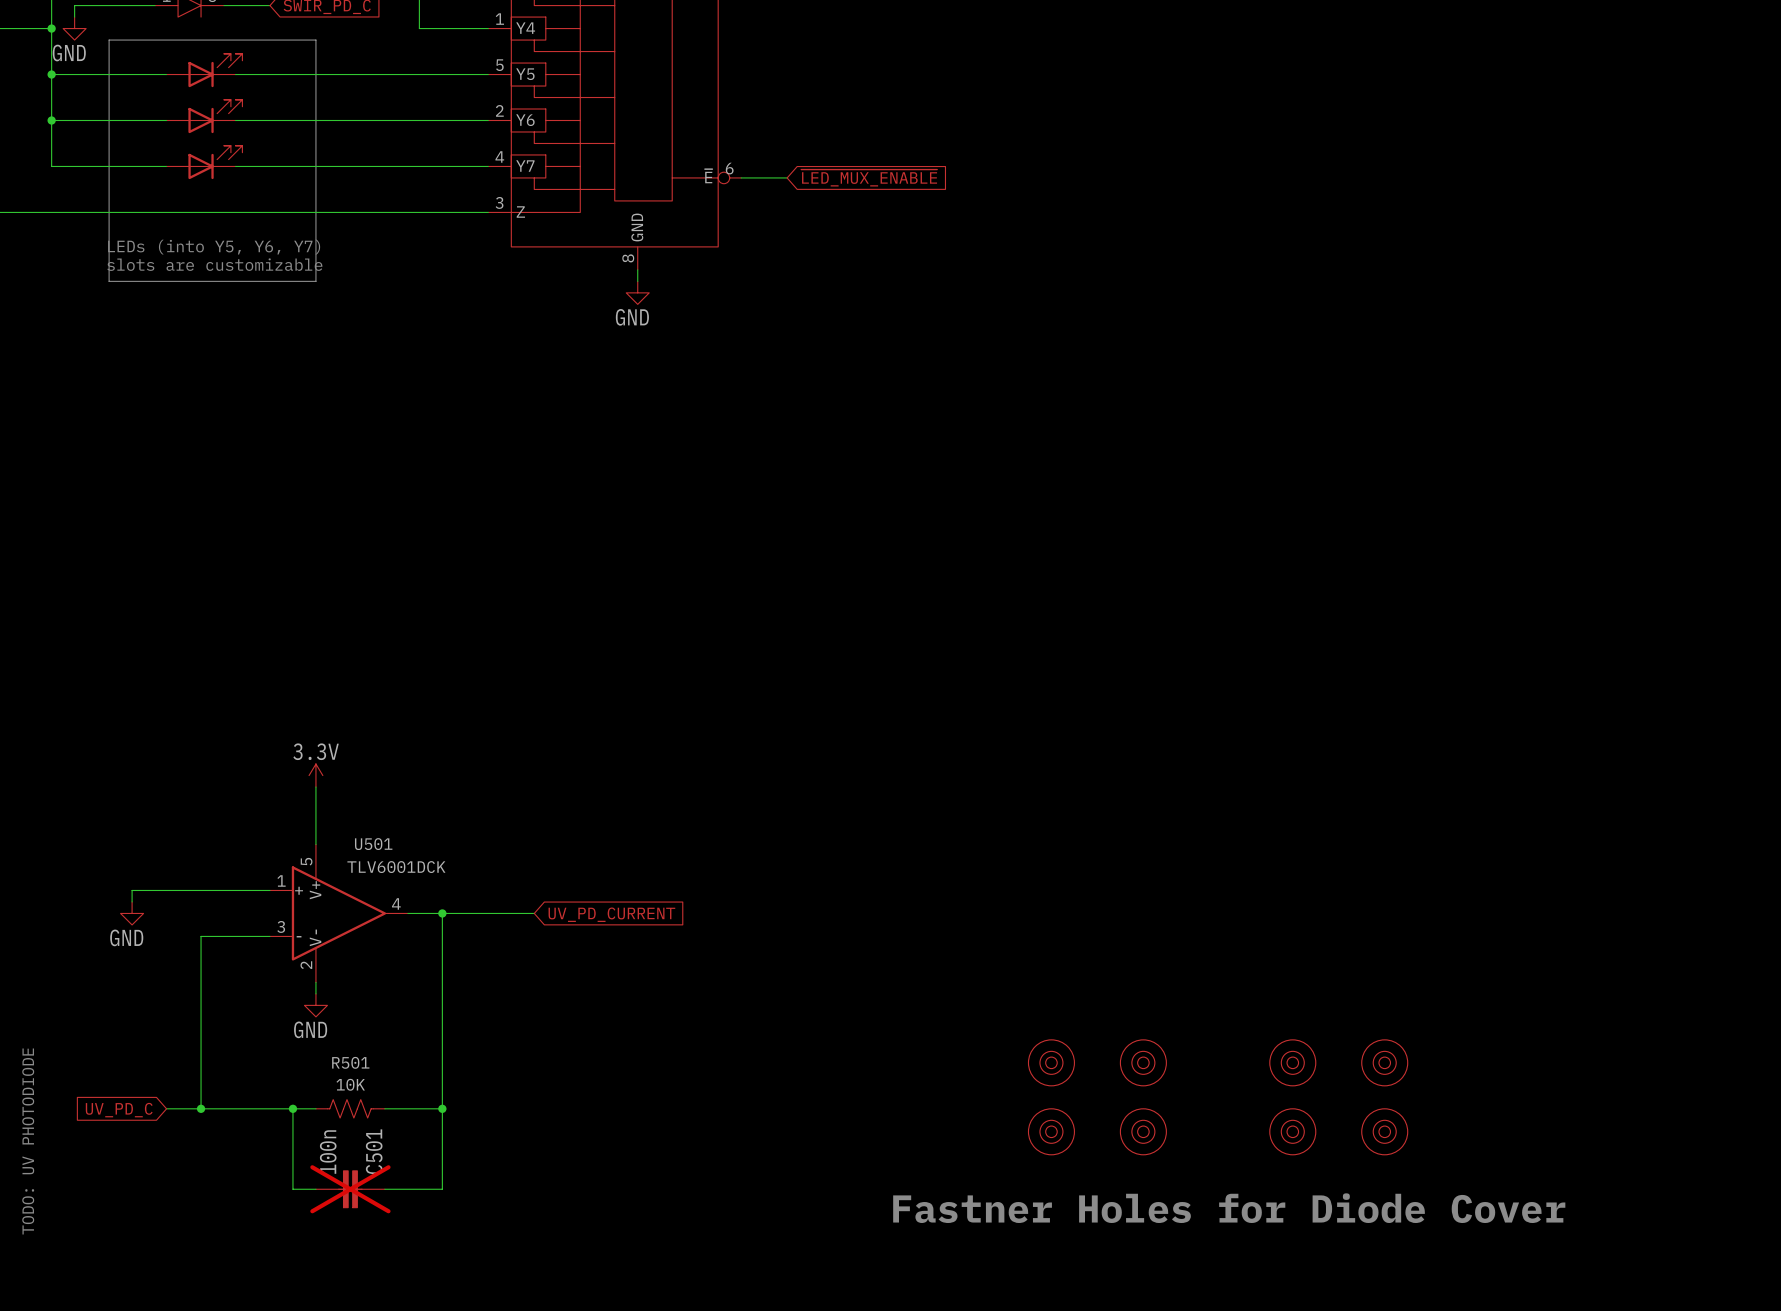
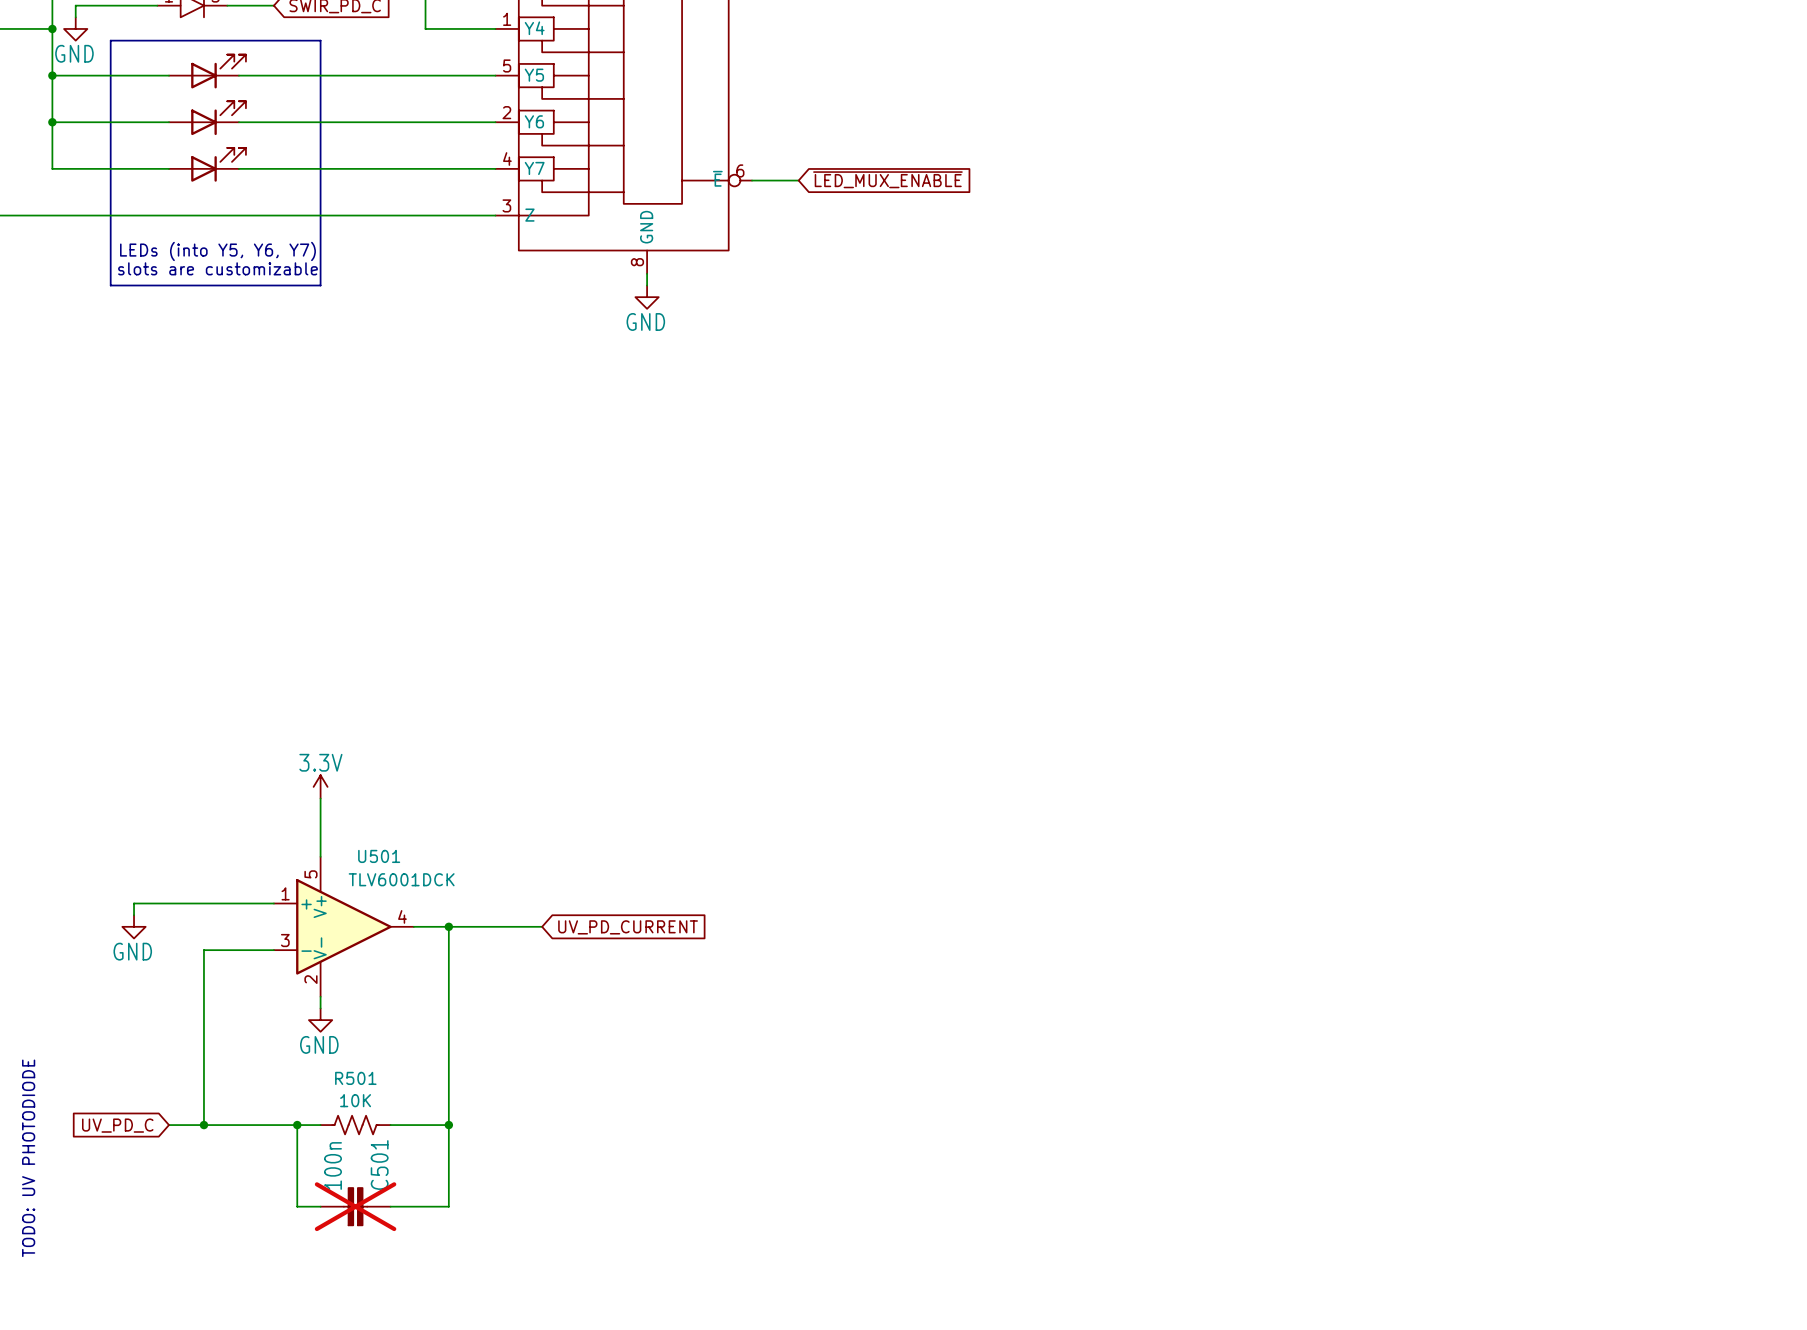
part: (1051, 1062) -> none
part: (1143, 1062) -> none
part: (1292, 1062) -> none
part: (1384, 1062) -> none
part: (1051, 1131) -> none
part: (1143, 1131) -> none
part: (1292, 1131) -> none
part: (1384, 1131) -> none
text: Fastner Holes for Diode Cover (1229, 1208) -> none

